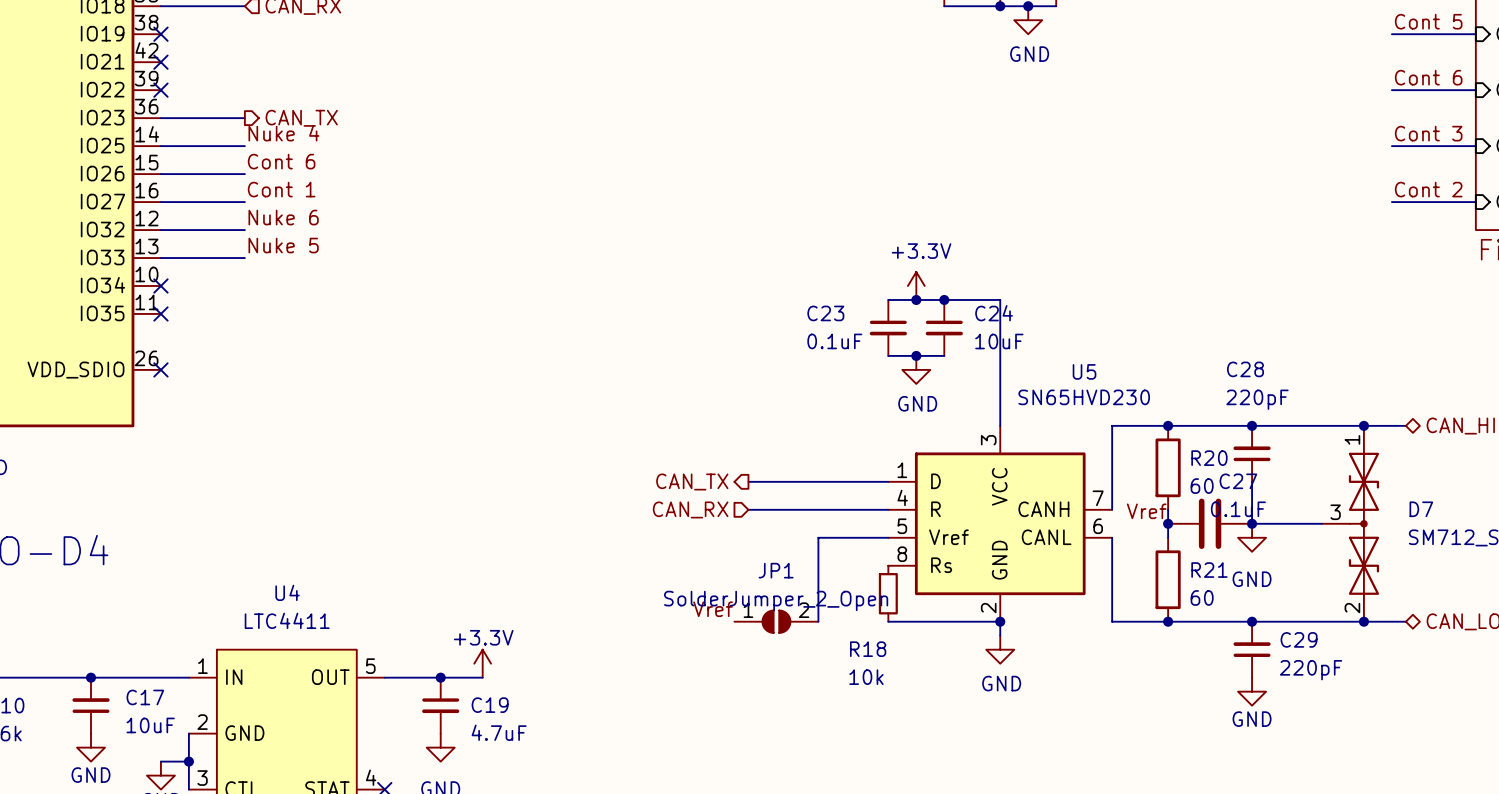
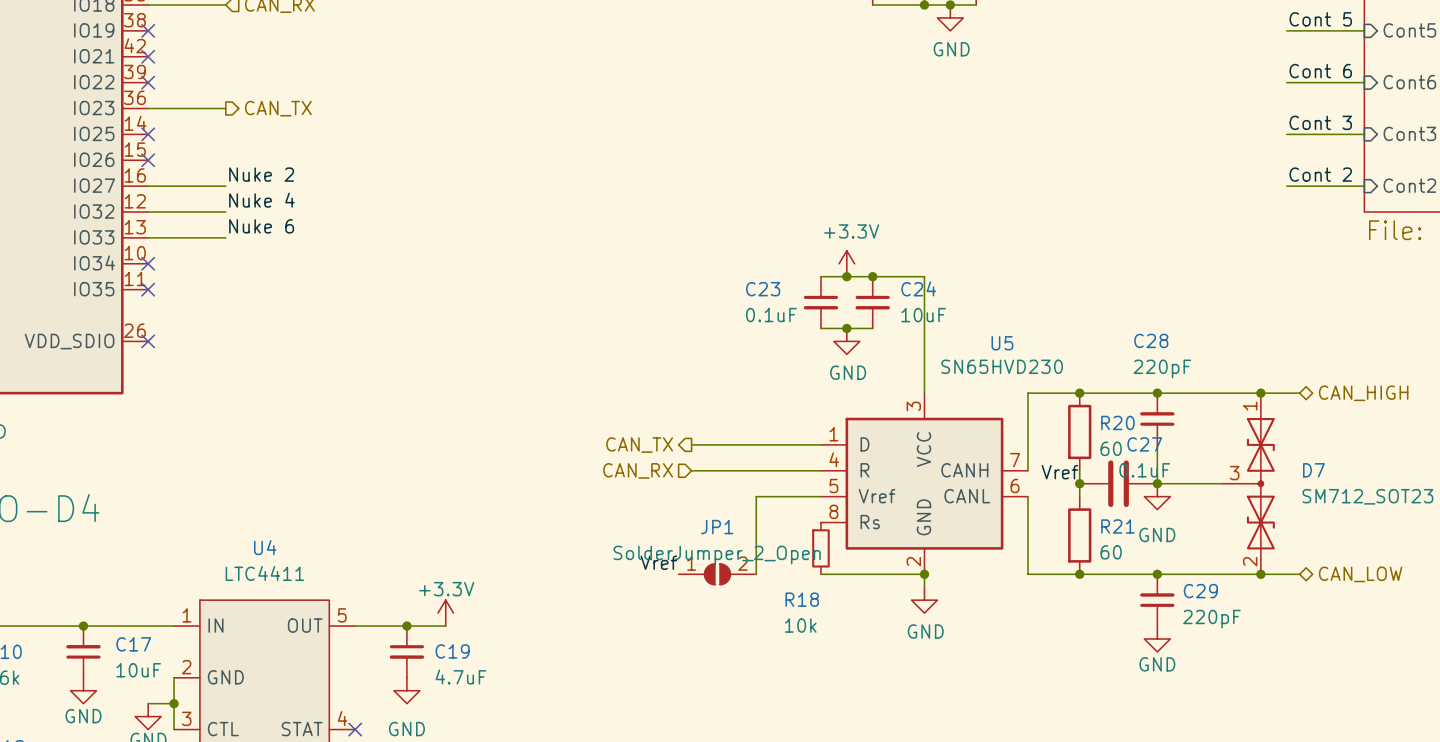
label: Nuke 4 (283, 133) -> none
wire: (160, 146) (244, 146) -> none
no-connect mark: none -> (148, 134)
label: Cont 6 (281, 161) -> none
wire: (160, 174) (244, 174) -> none
no-connect mark: none -> (148, 160)
label: Cont 1 (281, 189) -> Nuke 2 (261, 174)
label: Nuke 6 (283, 217) -> Nuke 4 (261, 200)
label: Nuke 5 (283, 245) -> Nuke 6 (261, 226)

